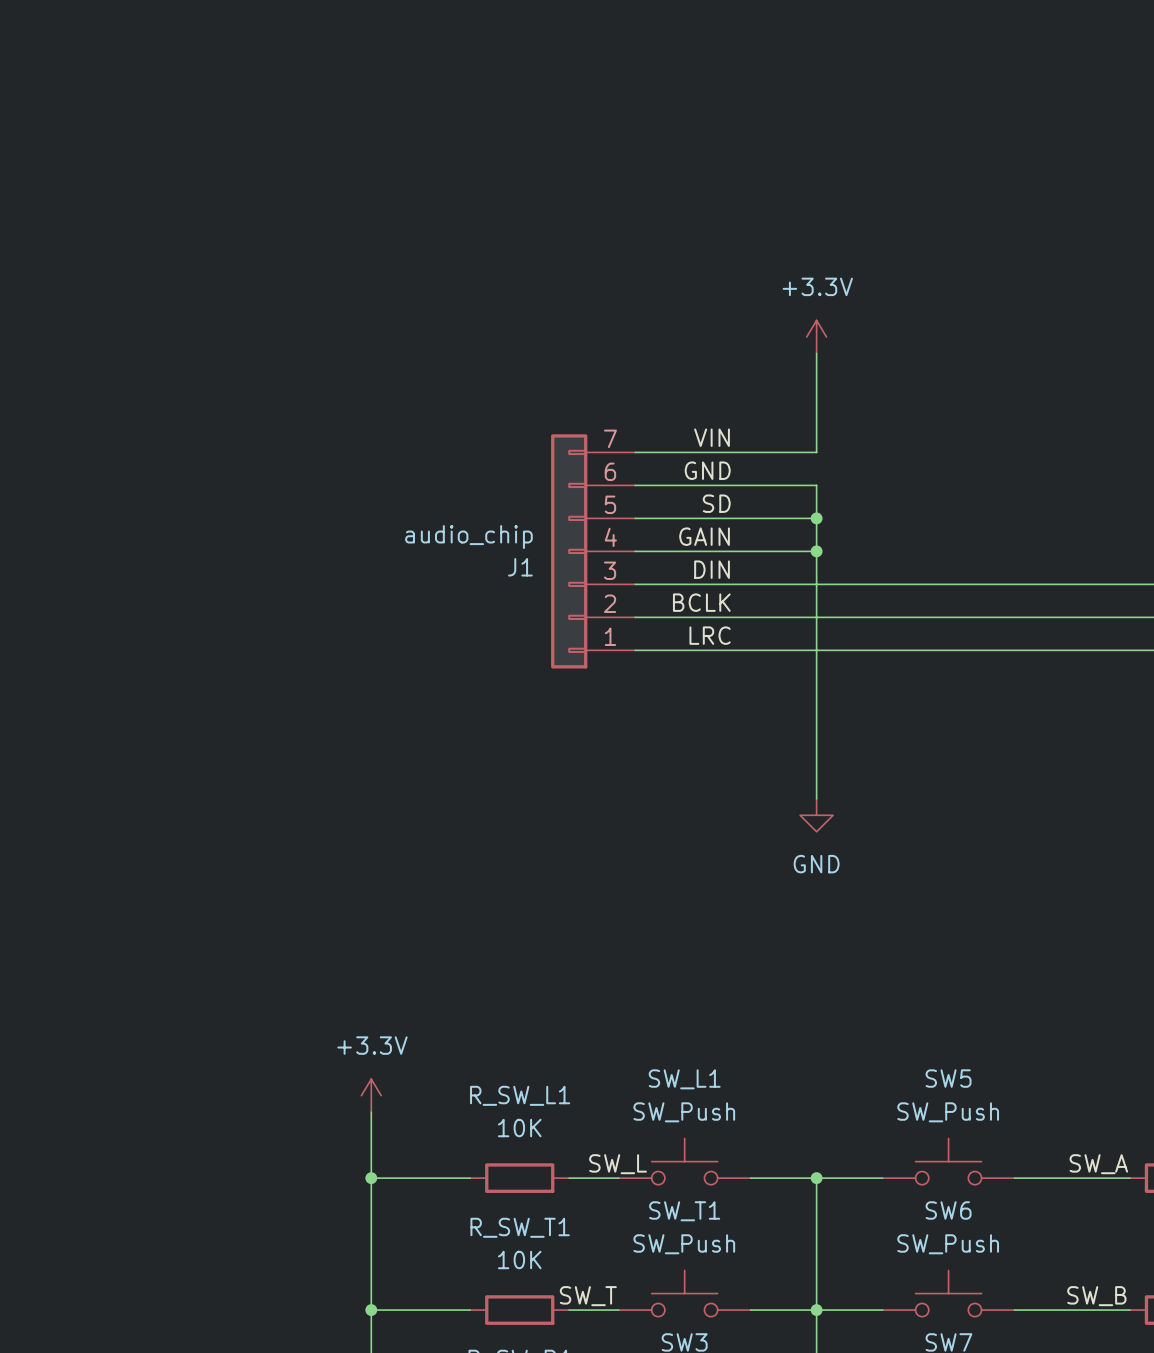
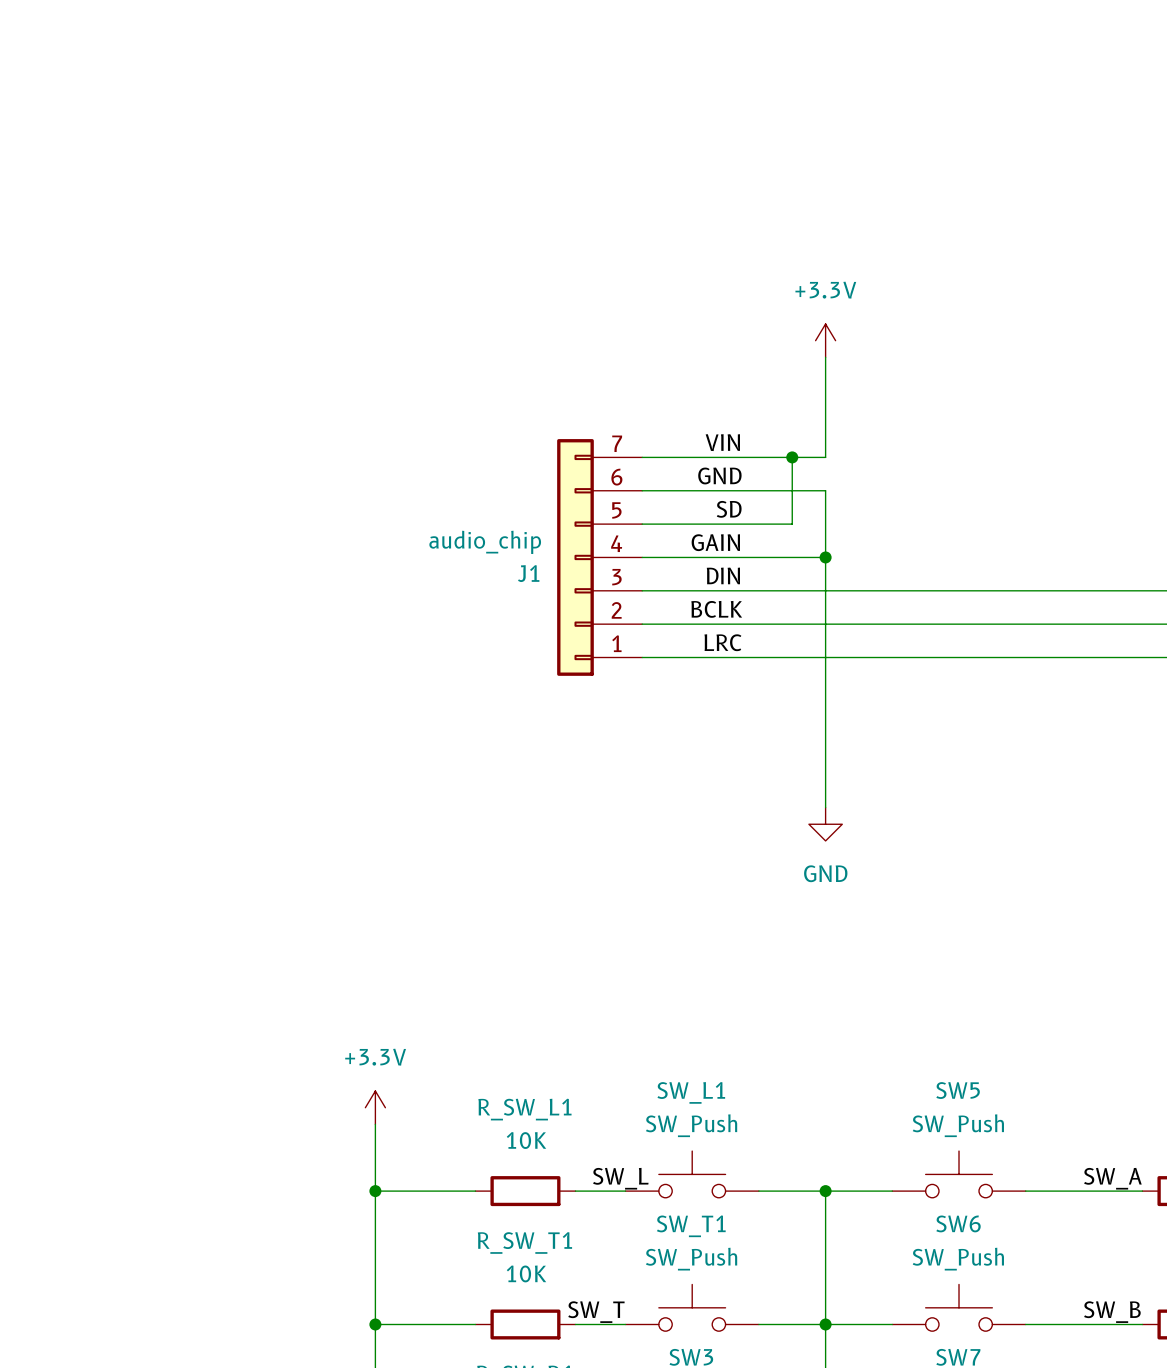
wire: (783, 518) (816, 518) -> (792, 524) (792, 457)
junction position: (816, 518) -> (792, 457)

